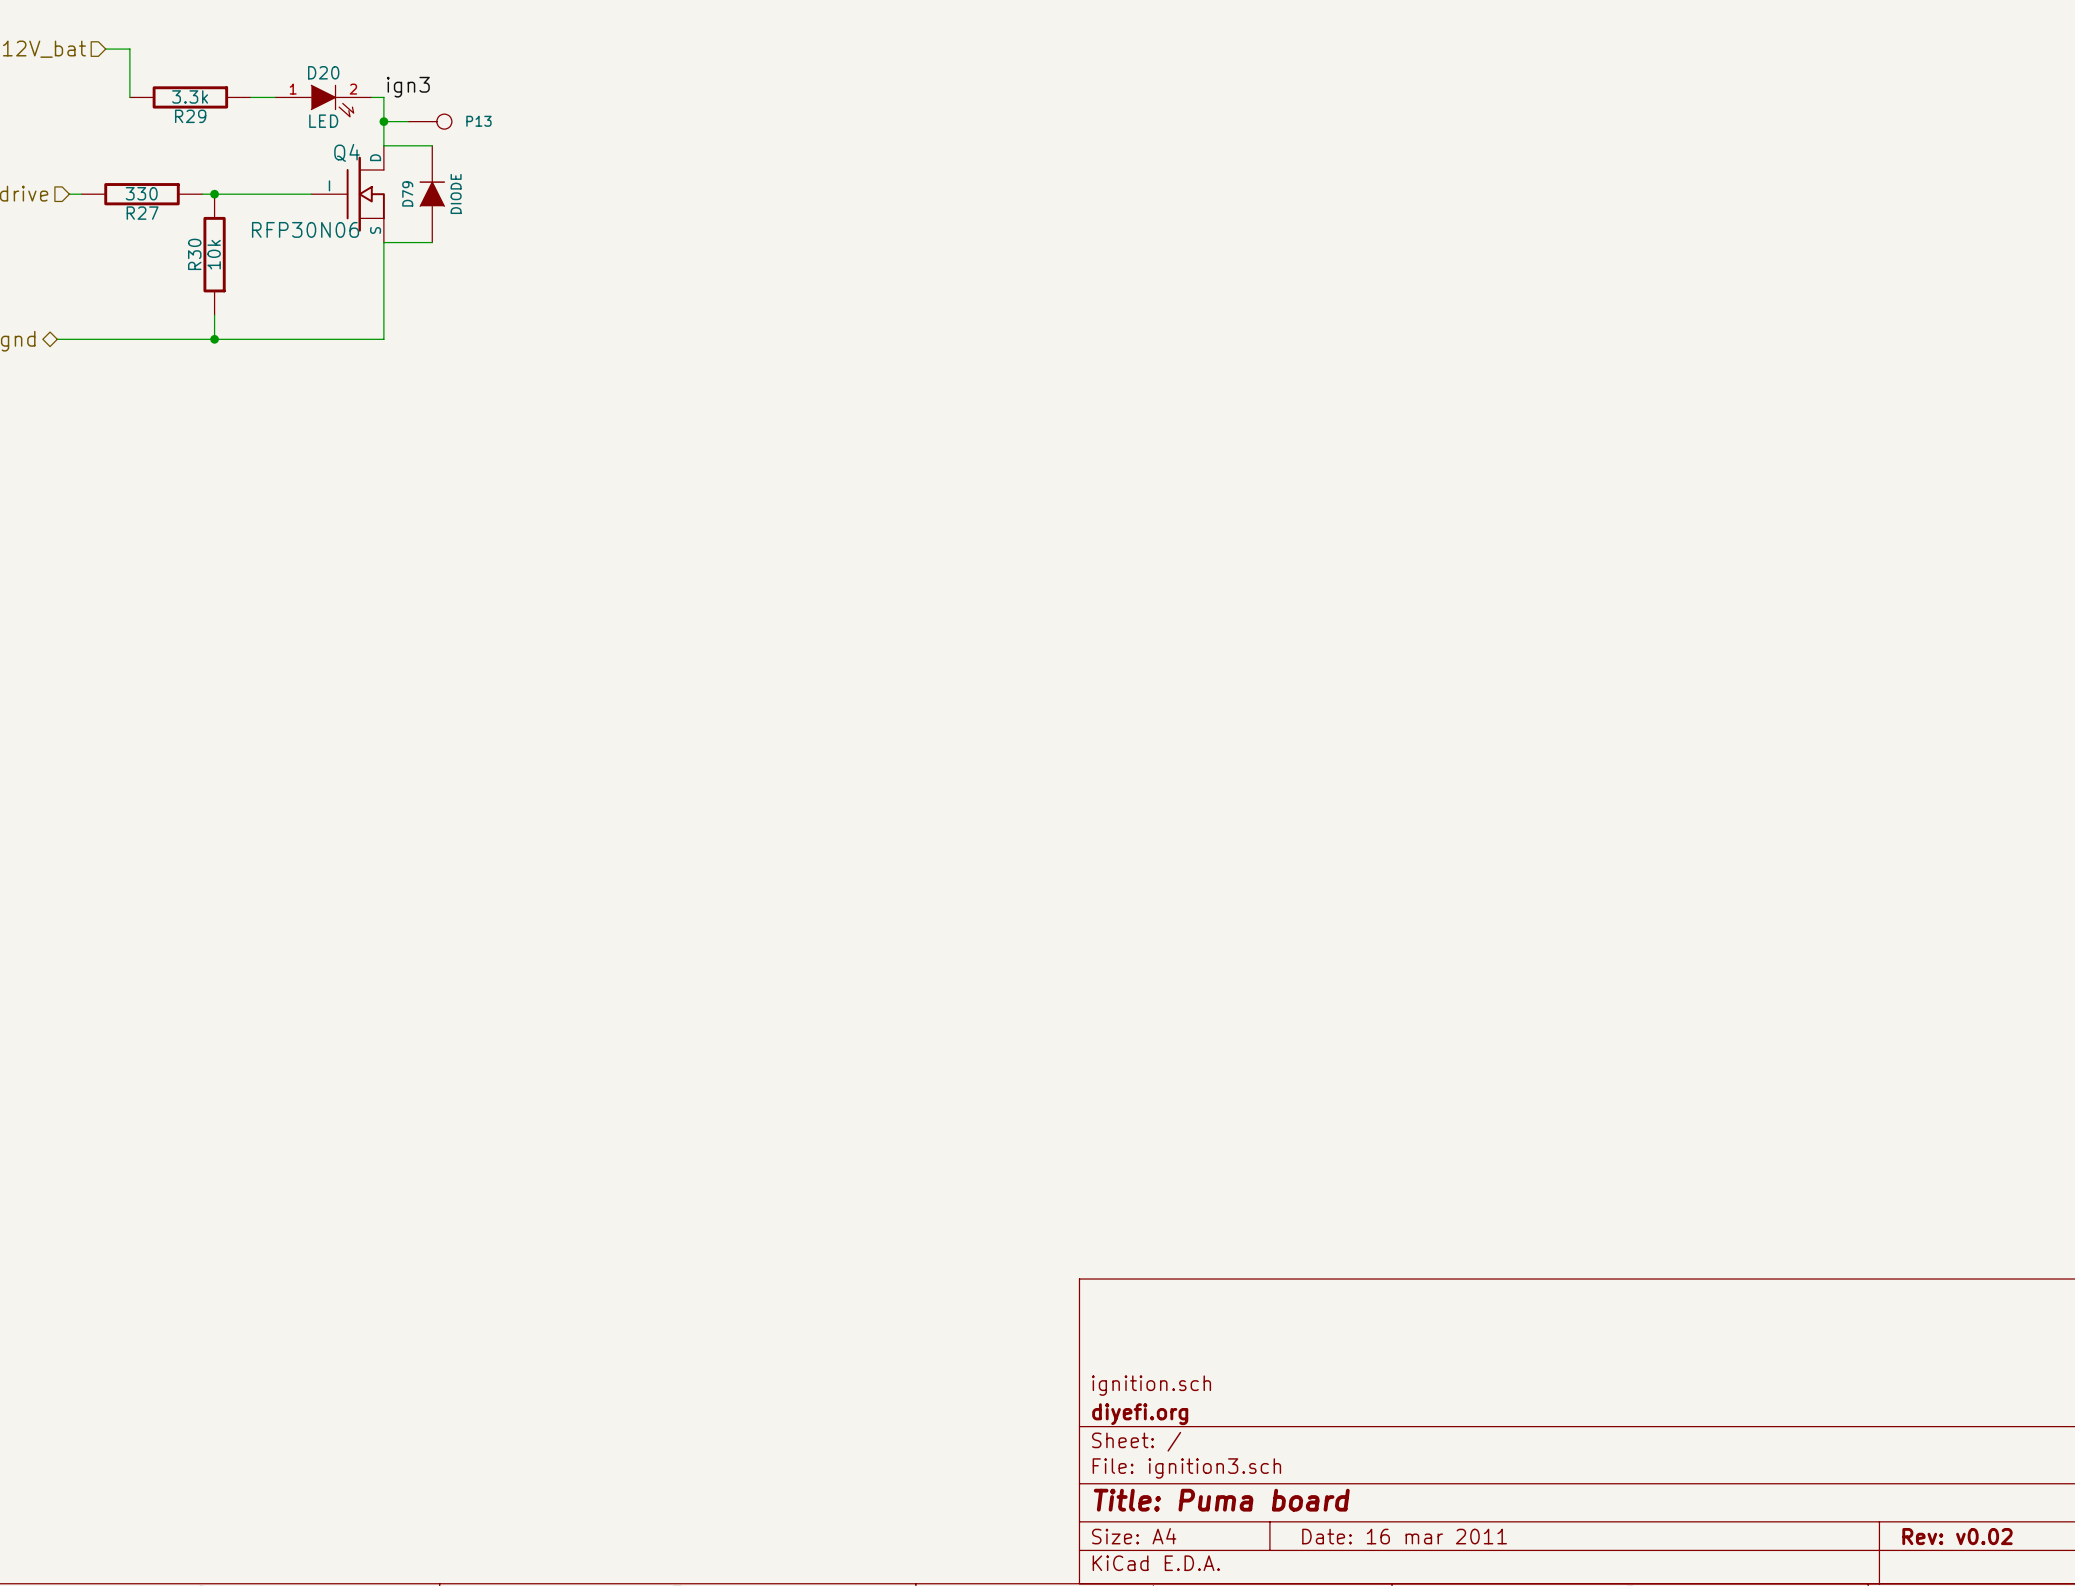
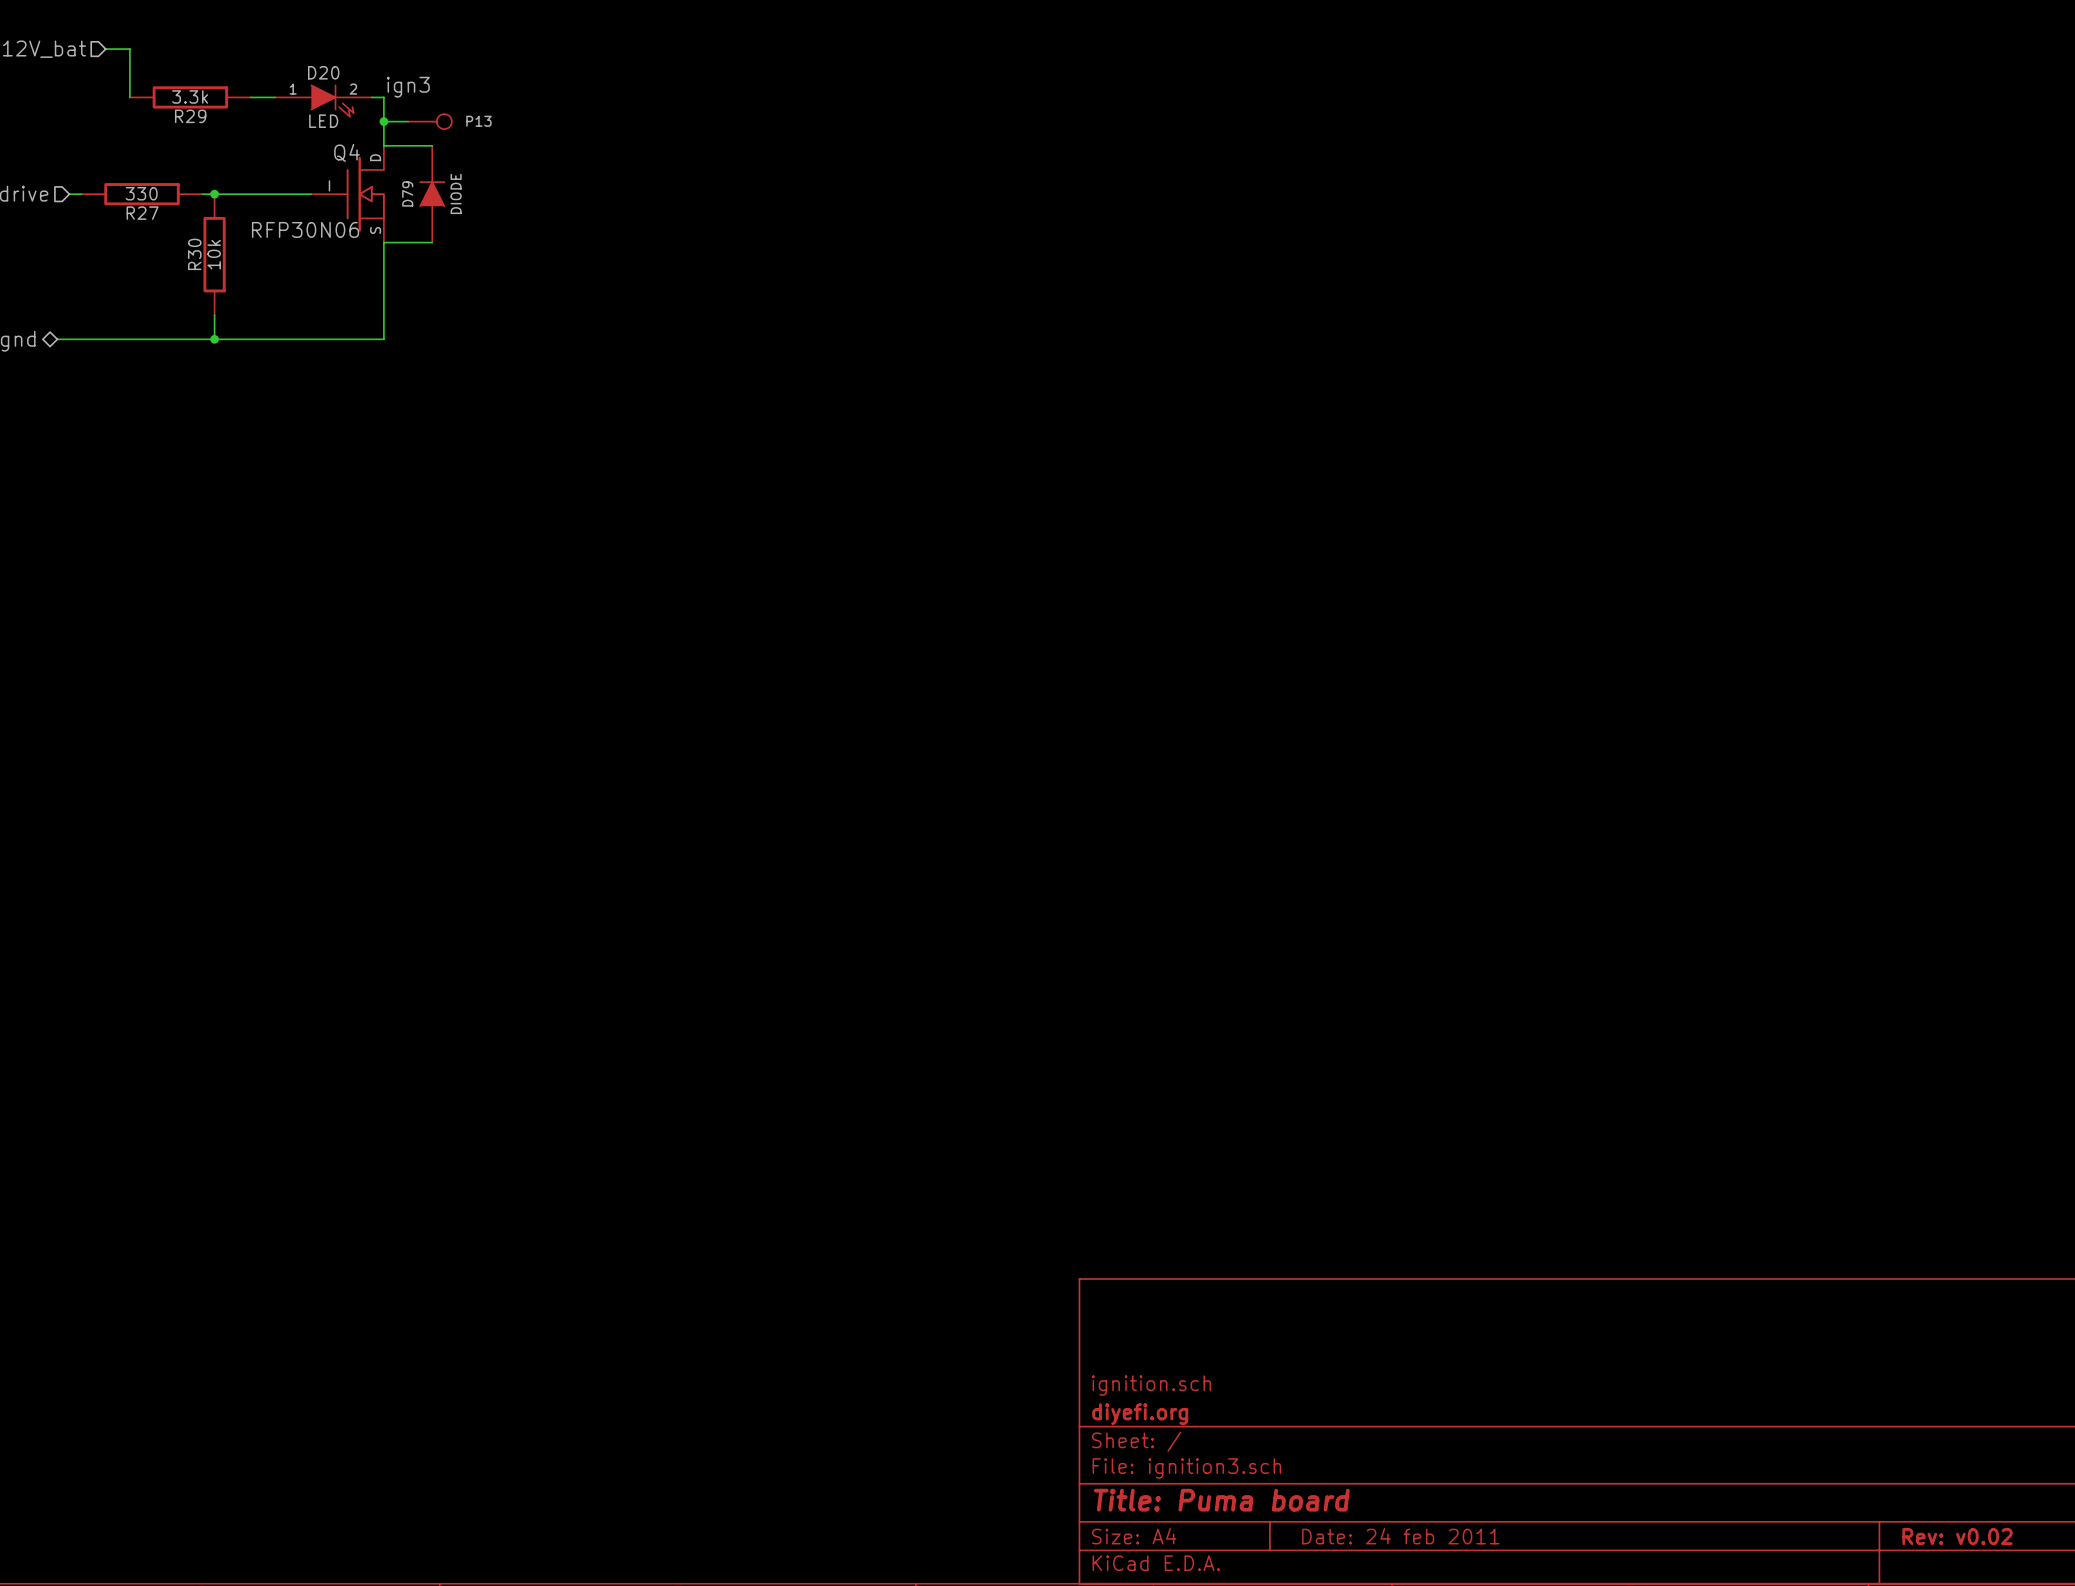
title block: Date: 16 mar 2011 (1404, 1536) -> Date: 24 feb 2011 (1400, 1536)

